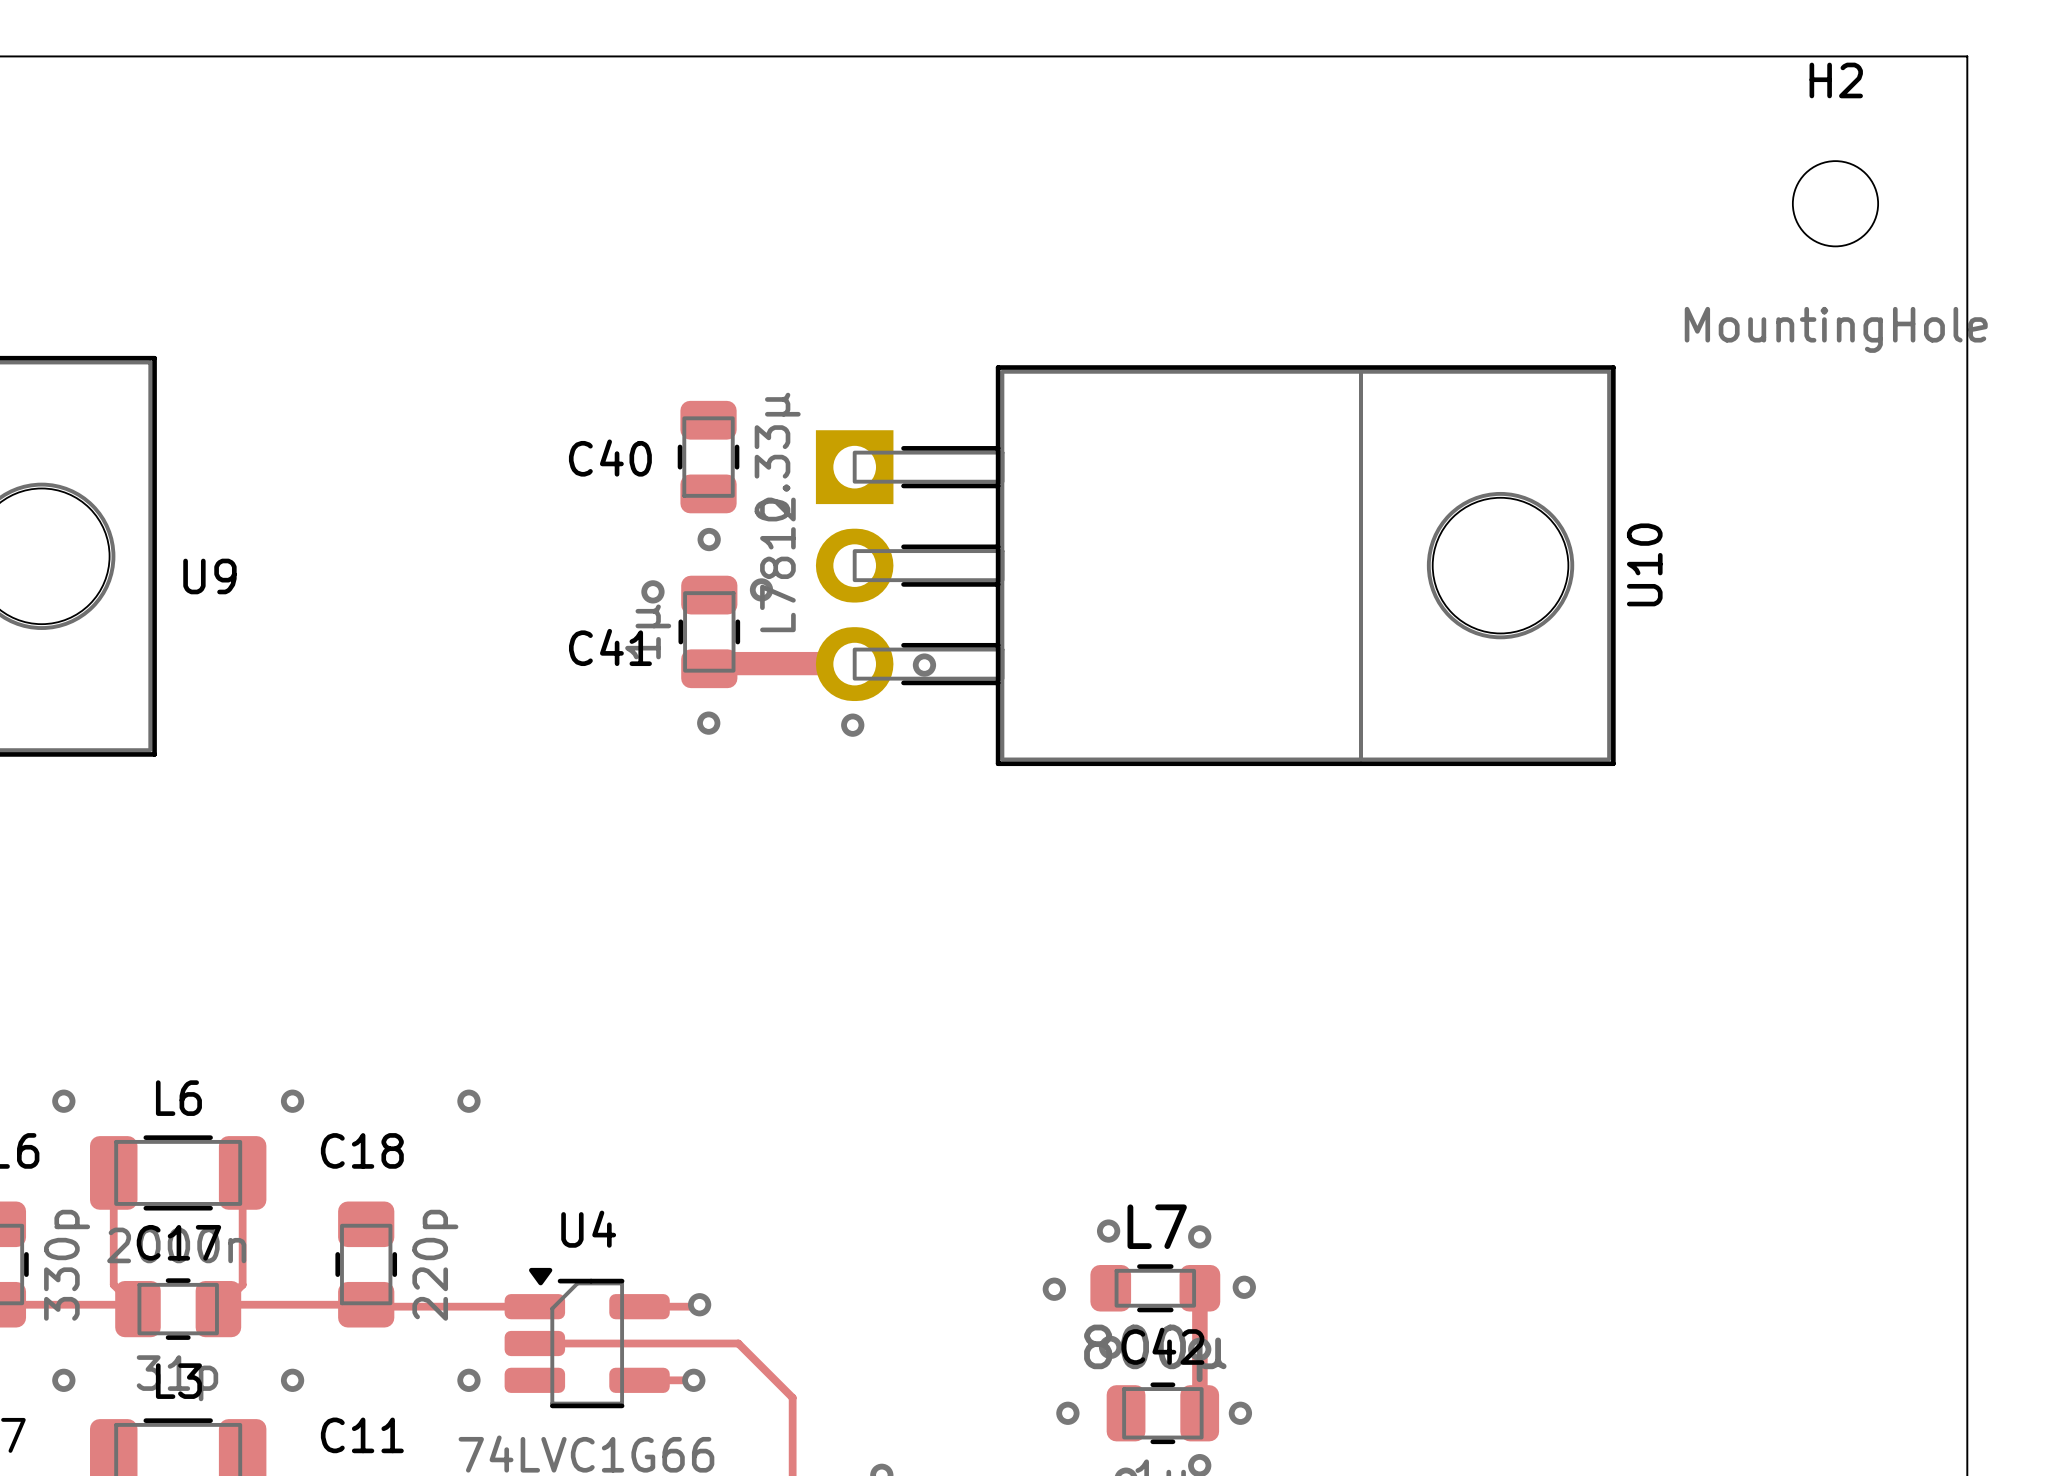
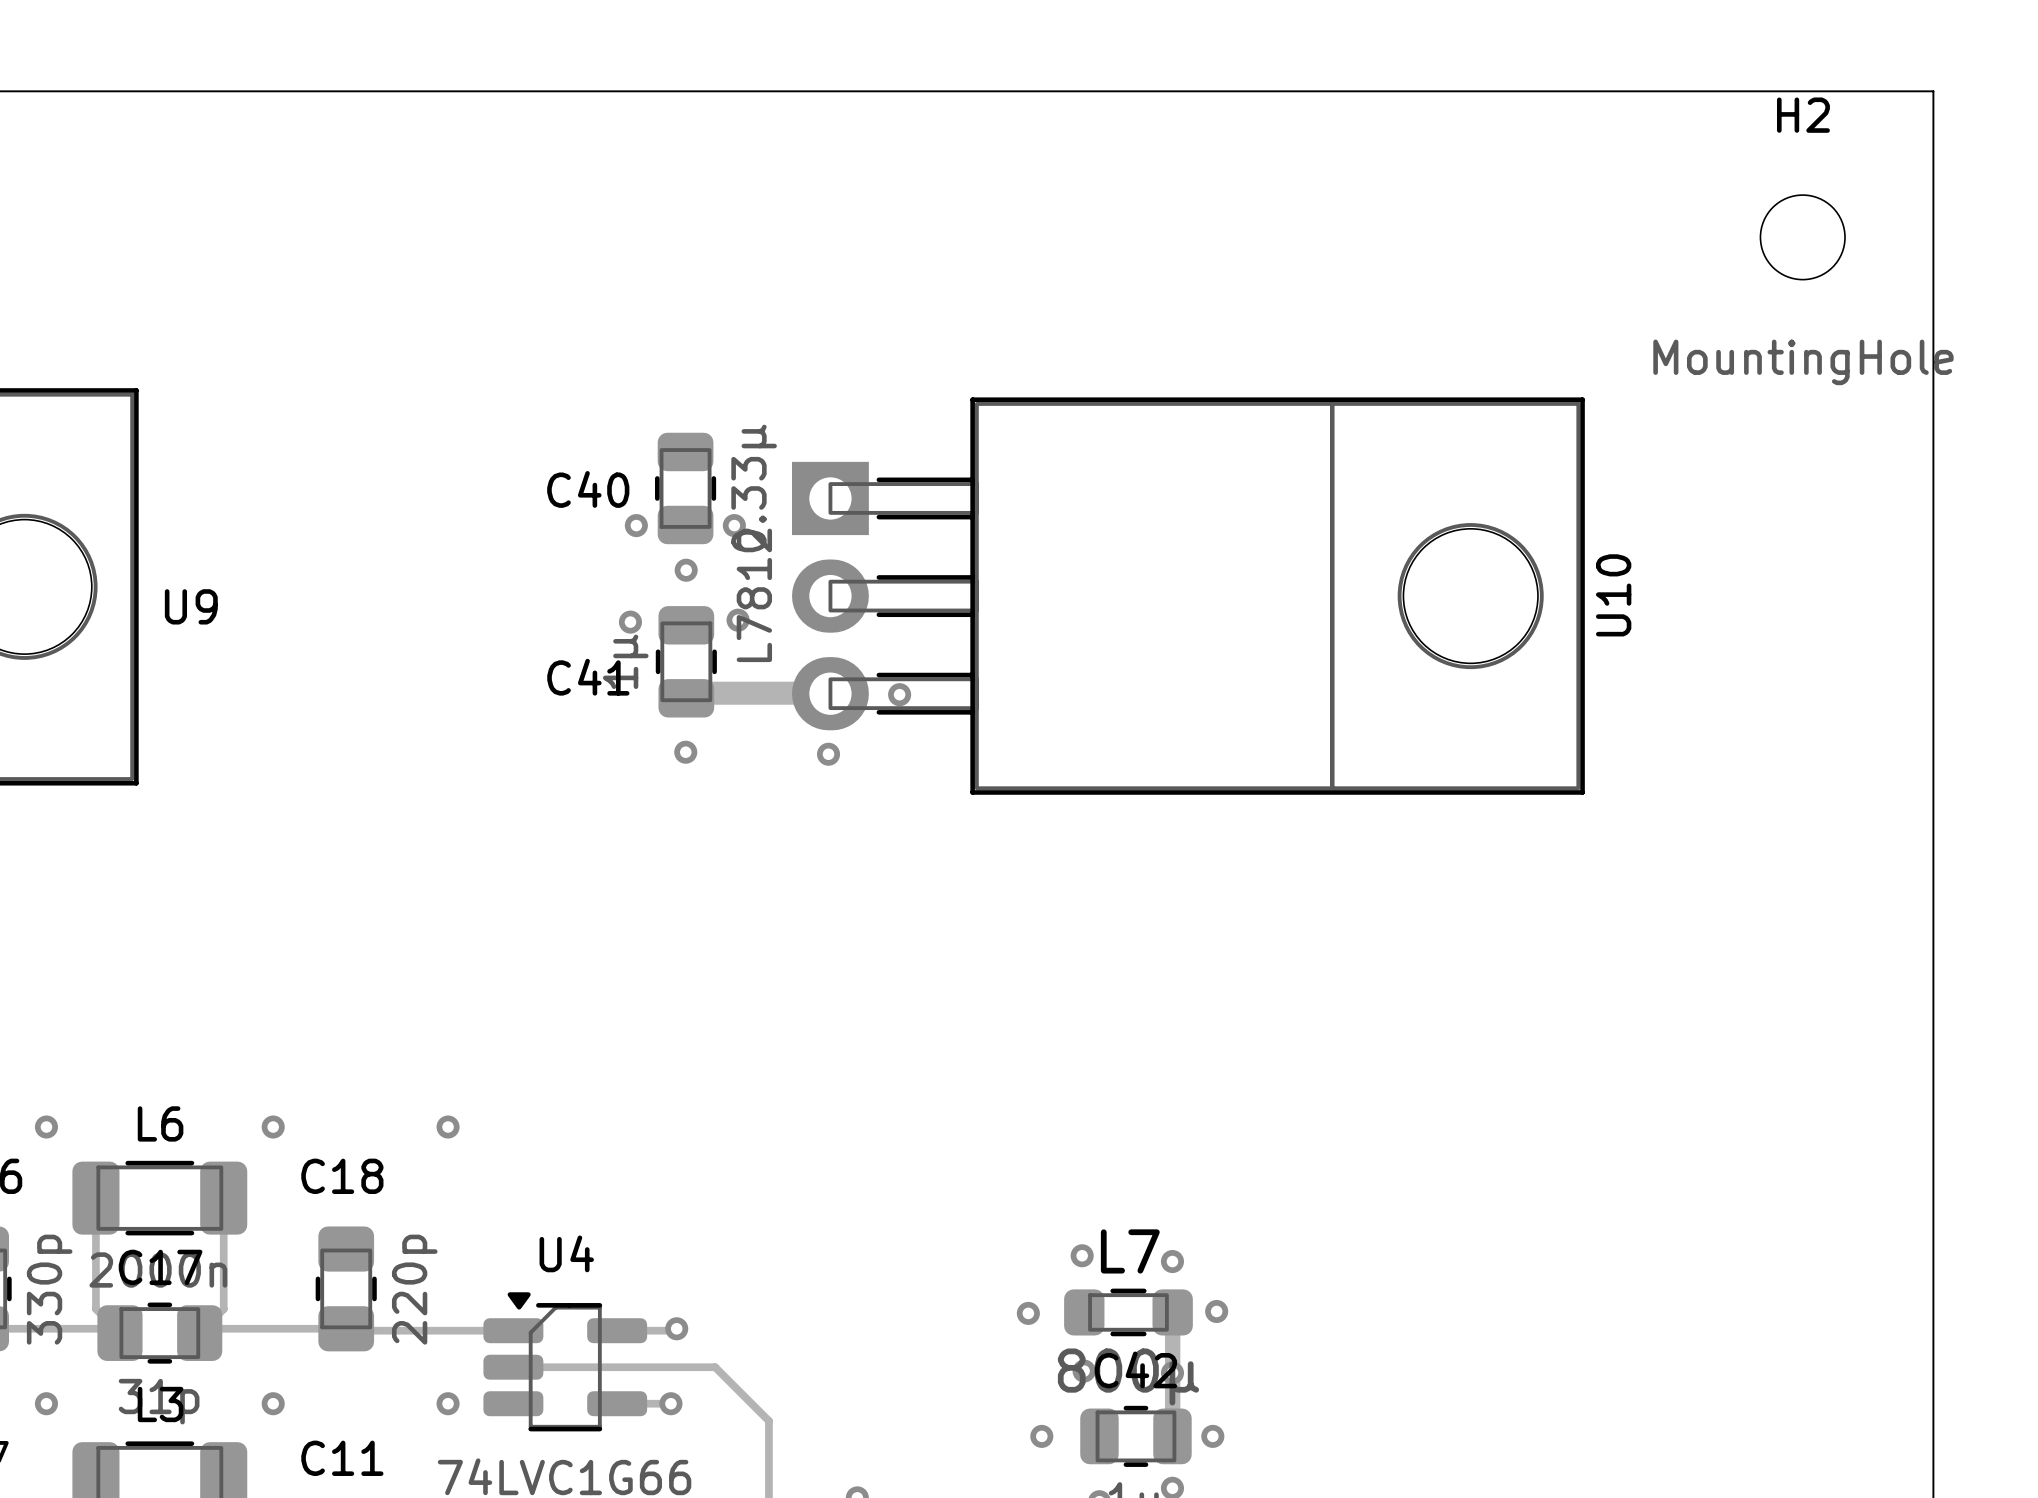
via: none -> (636, 525)
via: none -> (734, 525)

